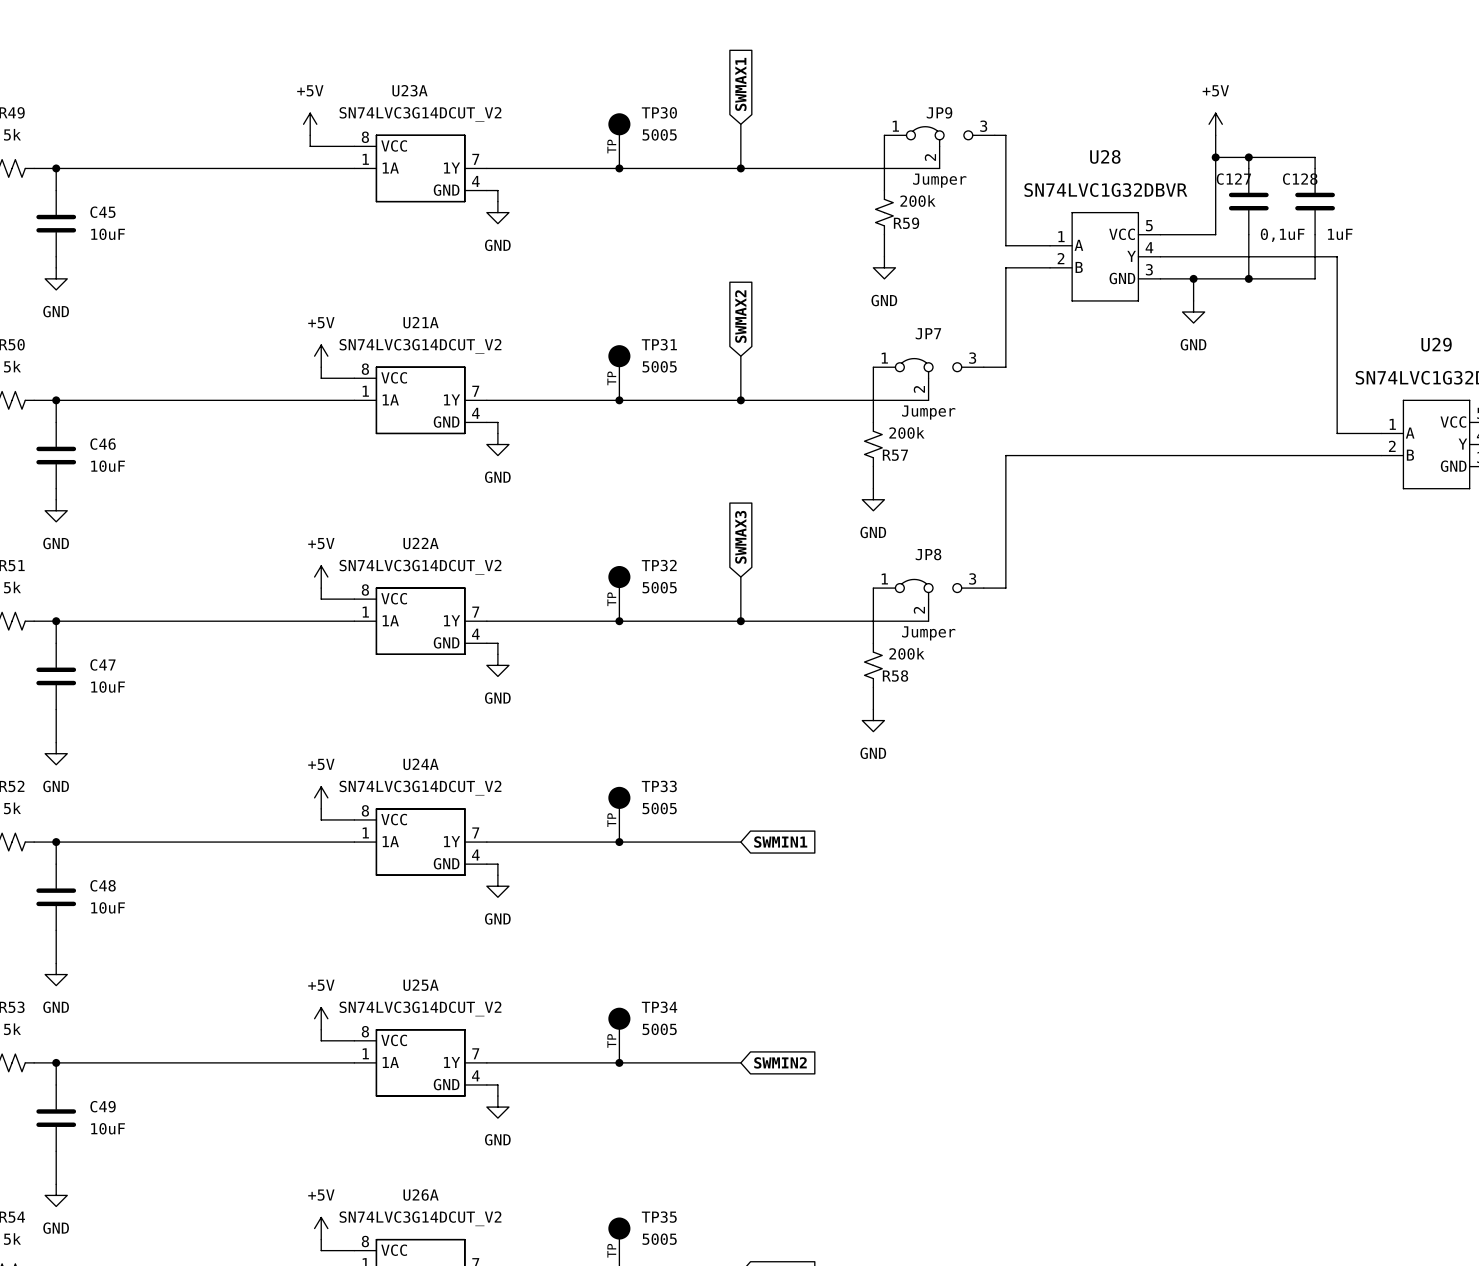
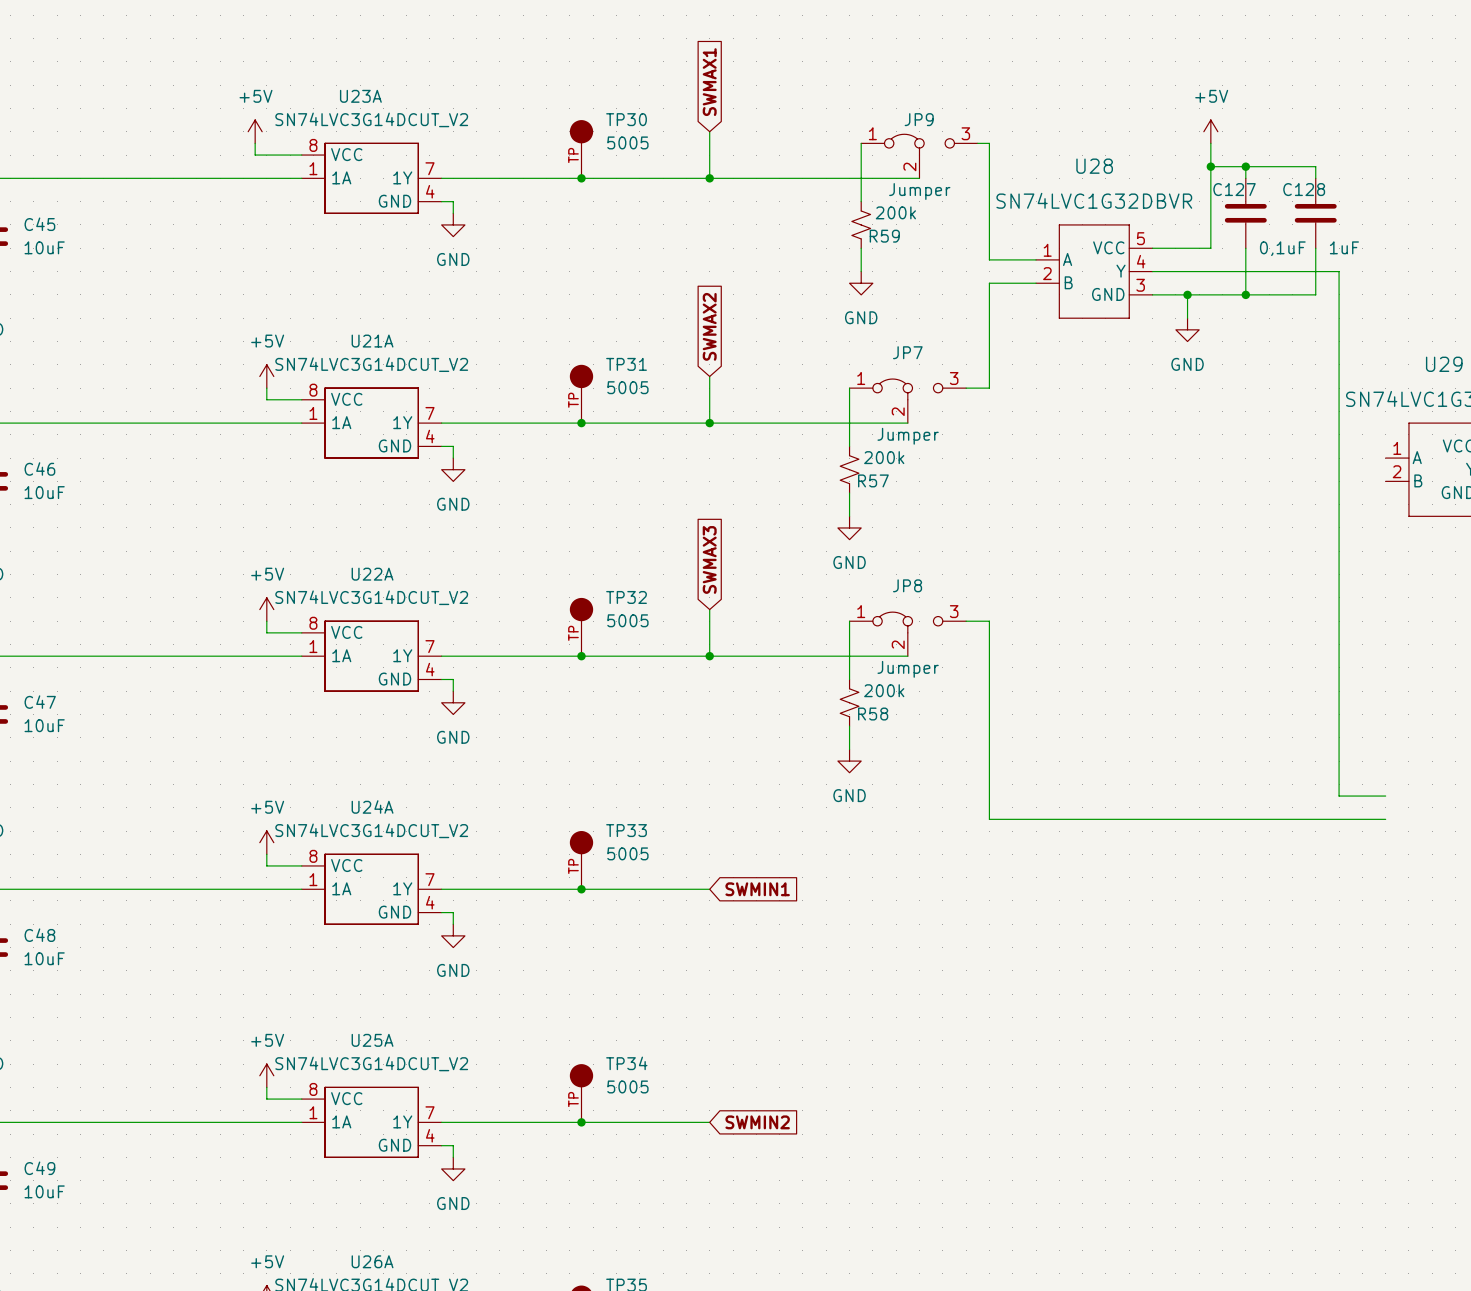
wire: (1337, 433) (1381, 433) -> (1339, 458) (1339, 796) (1385, 796)
wire: (1381, 455) (1005, 455) (1005, 588) -> (1385, 819) (989, 819) (989, 621)

